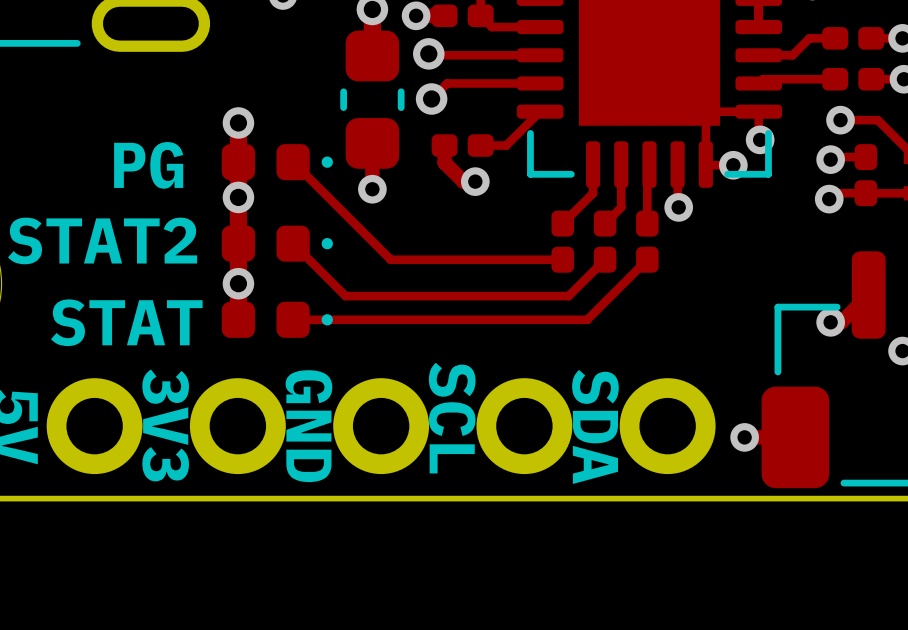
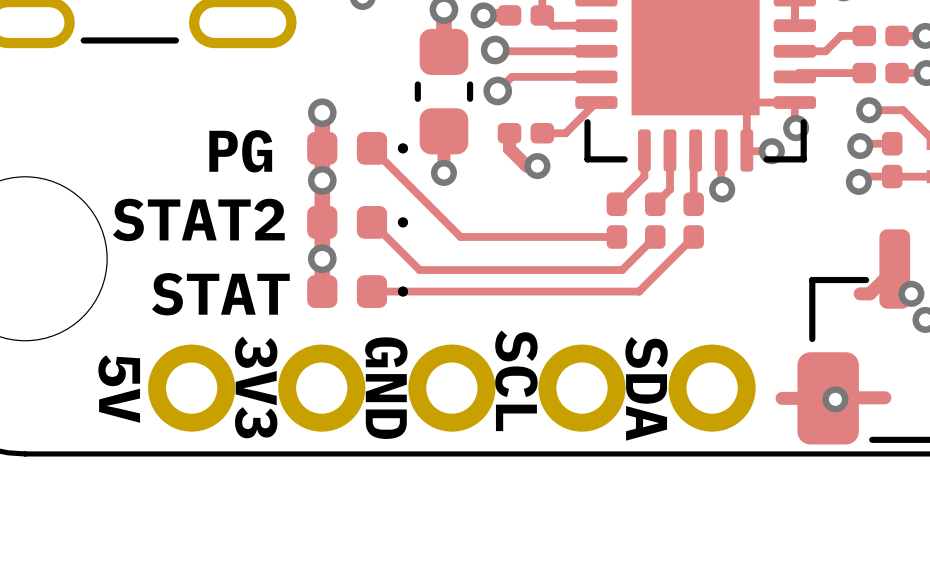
via position: (830, 322) -> (911, 293)
track: none -> (884, 397) (835, 399)
via position: (744, 437) -> (835, 399)

